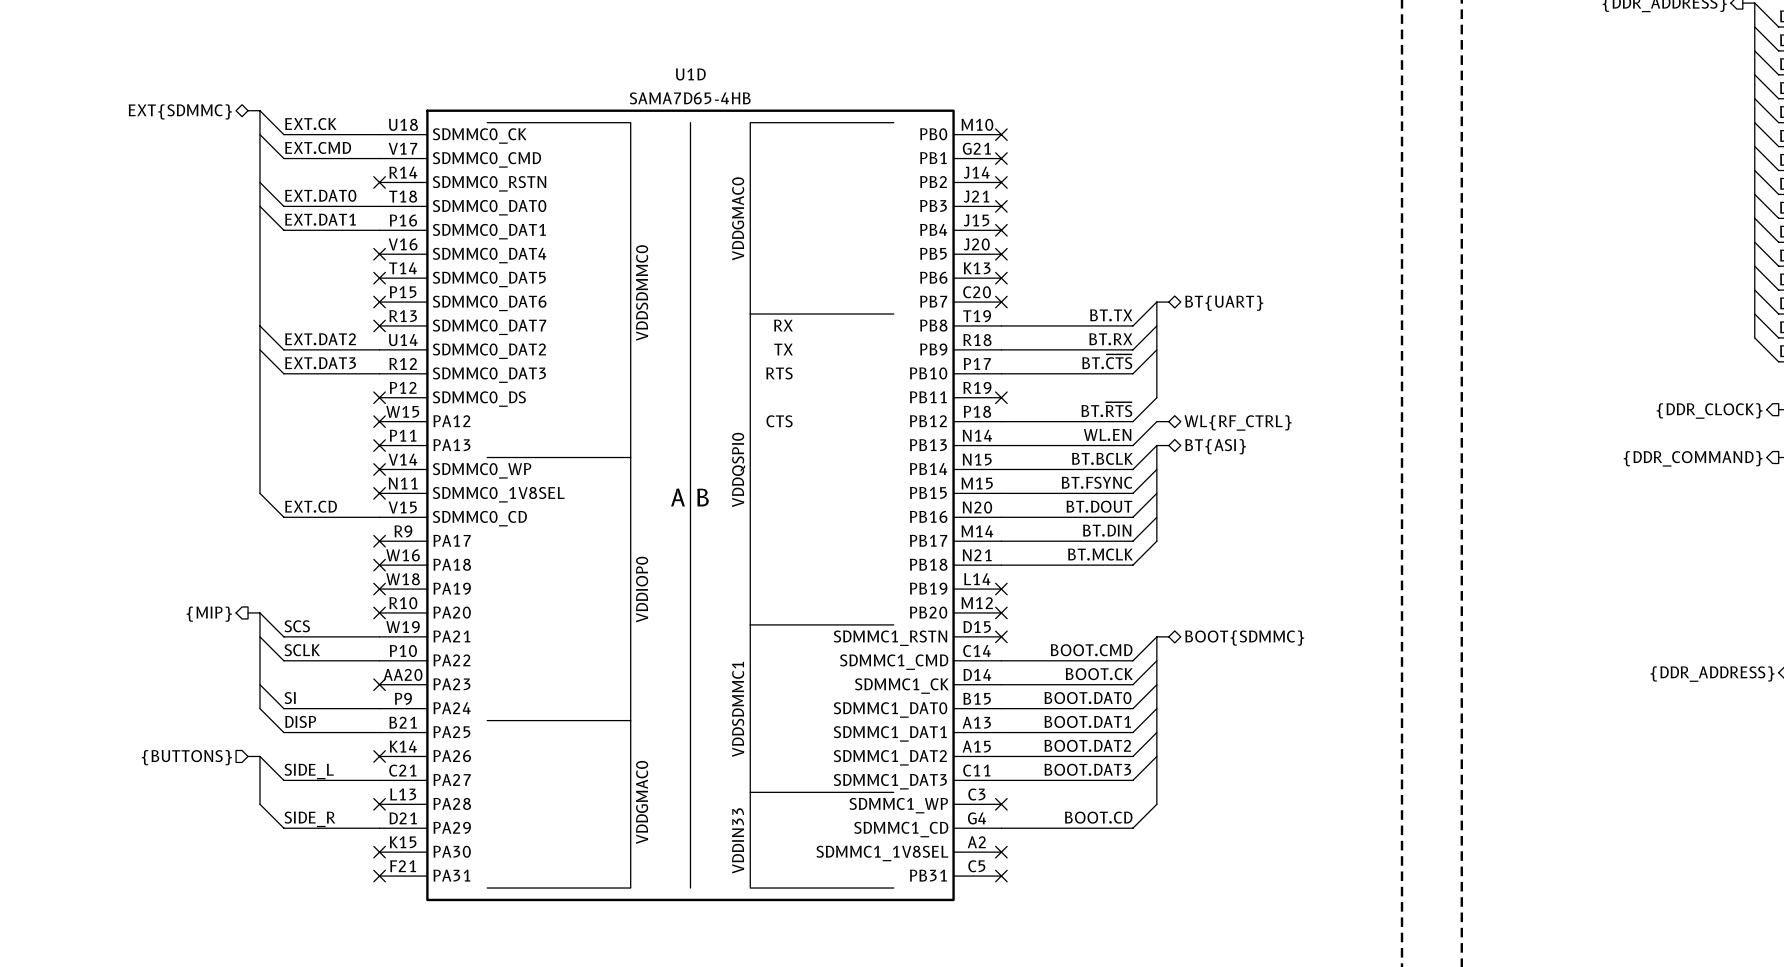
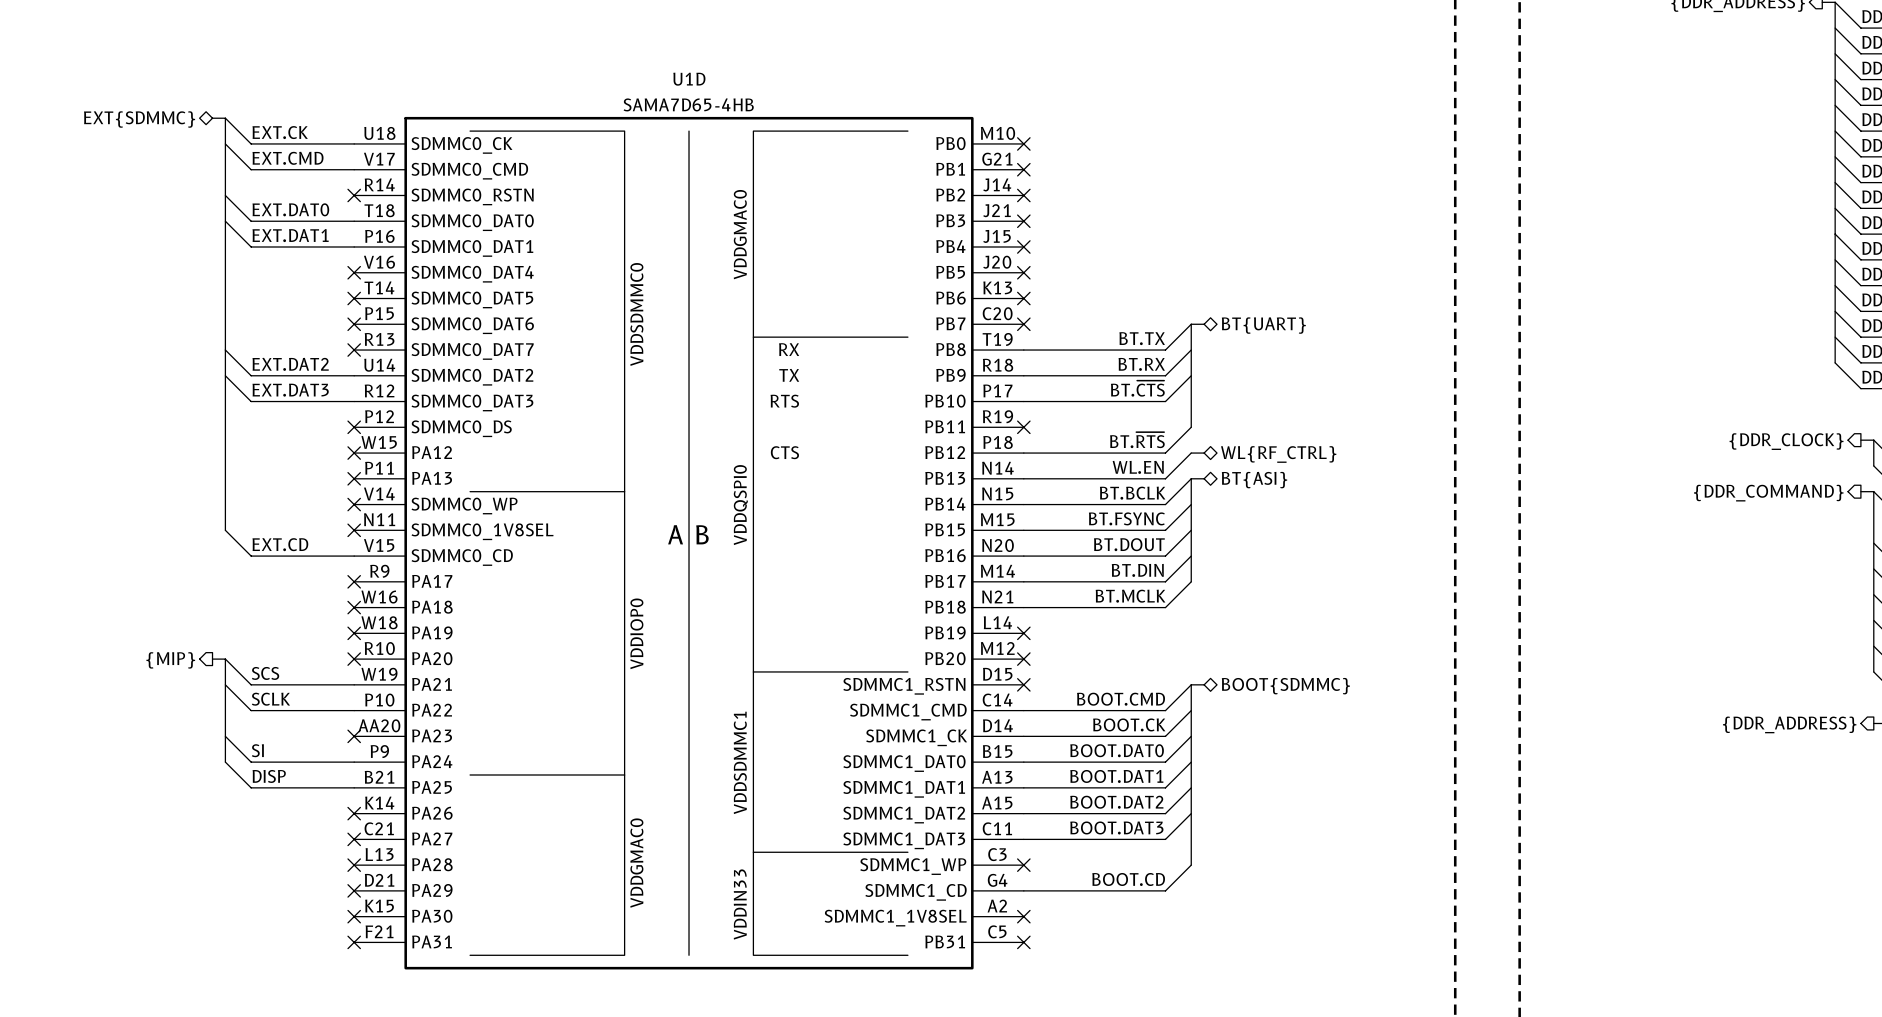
bus: (248, 756) (259, 756) (259, 804) -> none
wire: (259, 756) (283, 780) (379, 780) -> none
hierarchical label: {BUTTONS} (186, 757) -> none
label: SIDE_L (309, 771) -> none
no-connect mark: none -> (354, 839)
wire: (259, 804) (283, 828) (379, 828) -> none
label: SIDE_R (309, 819) -> none
no-connect mark: none -> (354, 890)

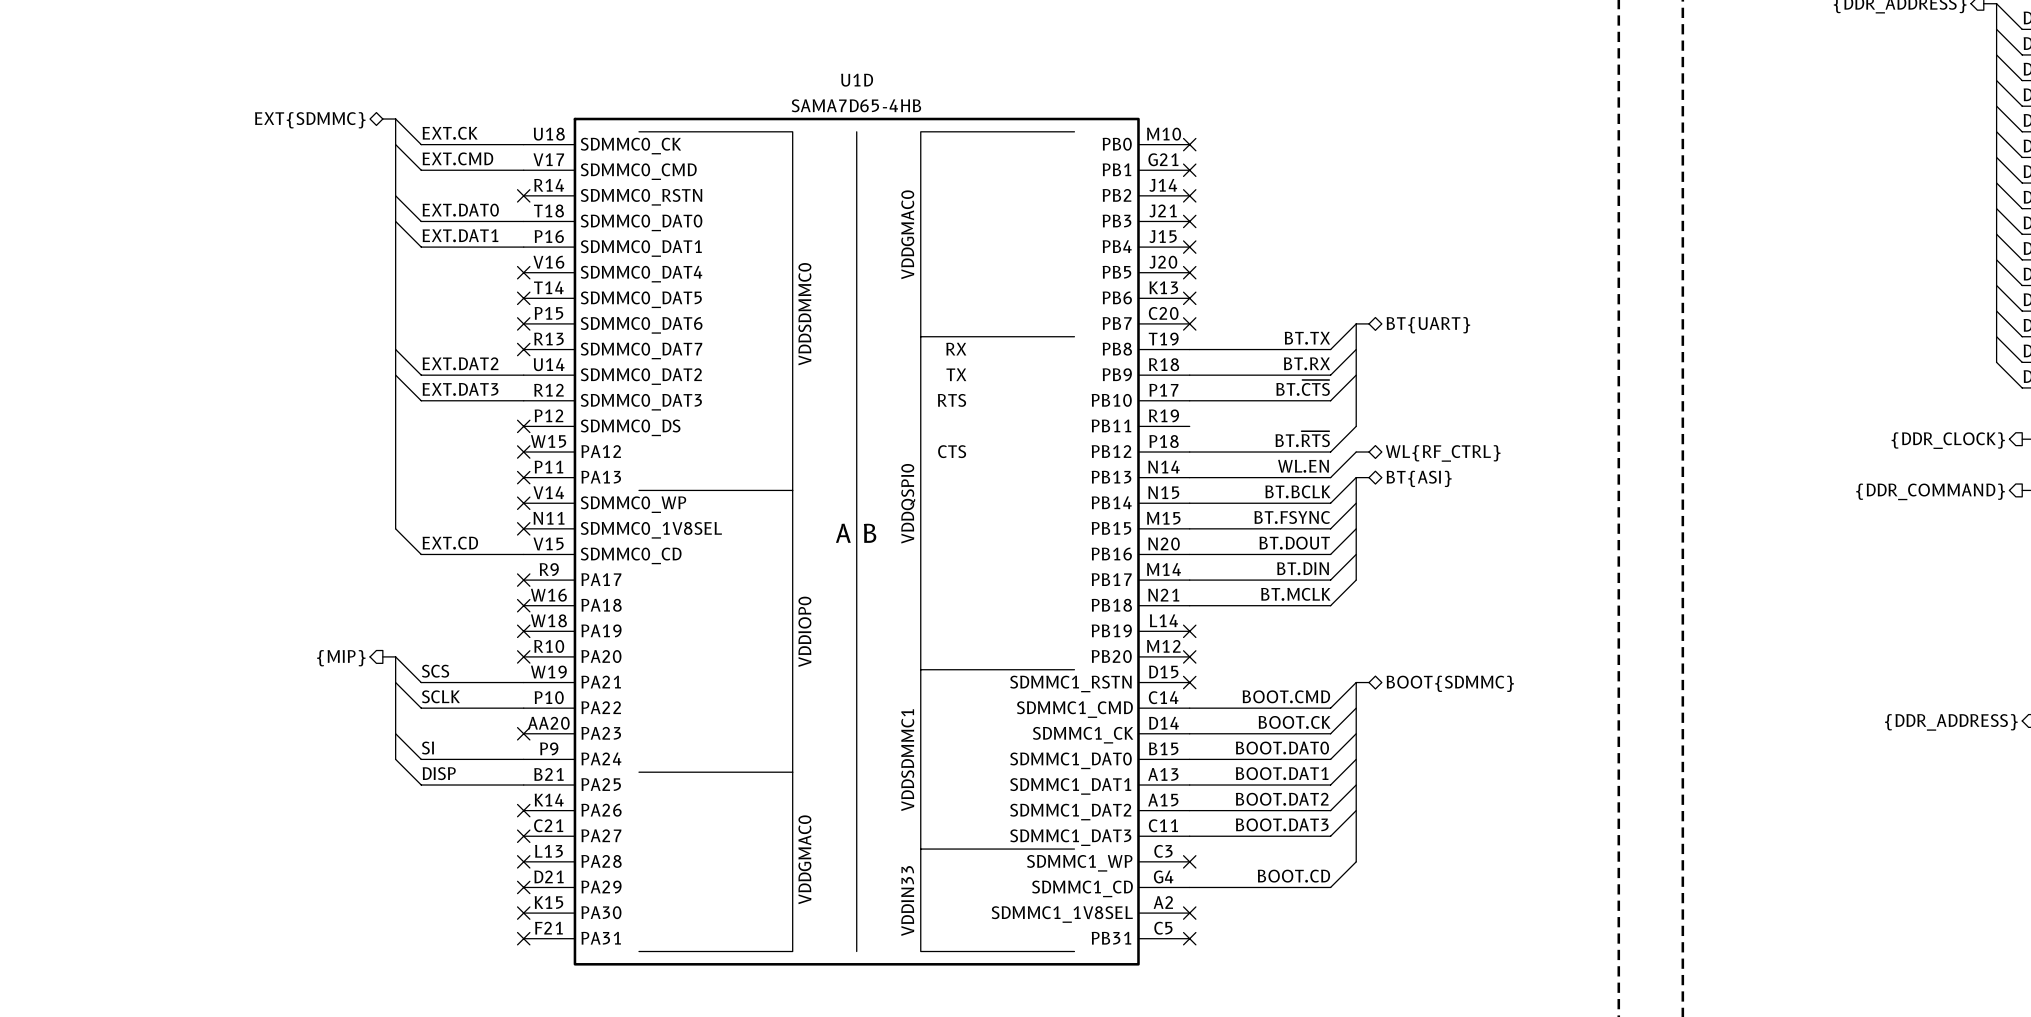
no-connect mark: (1023, 427) -> none

